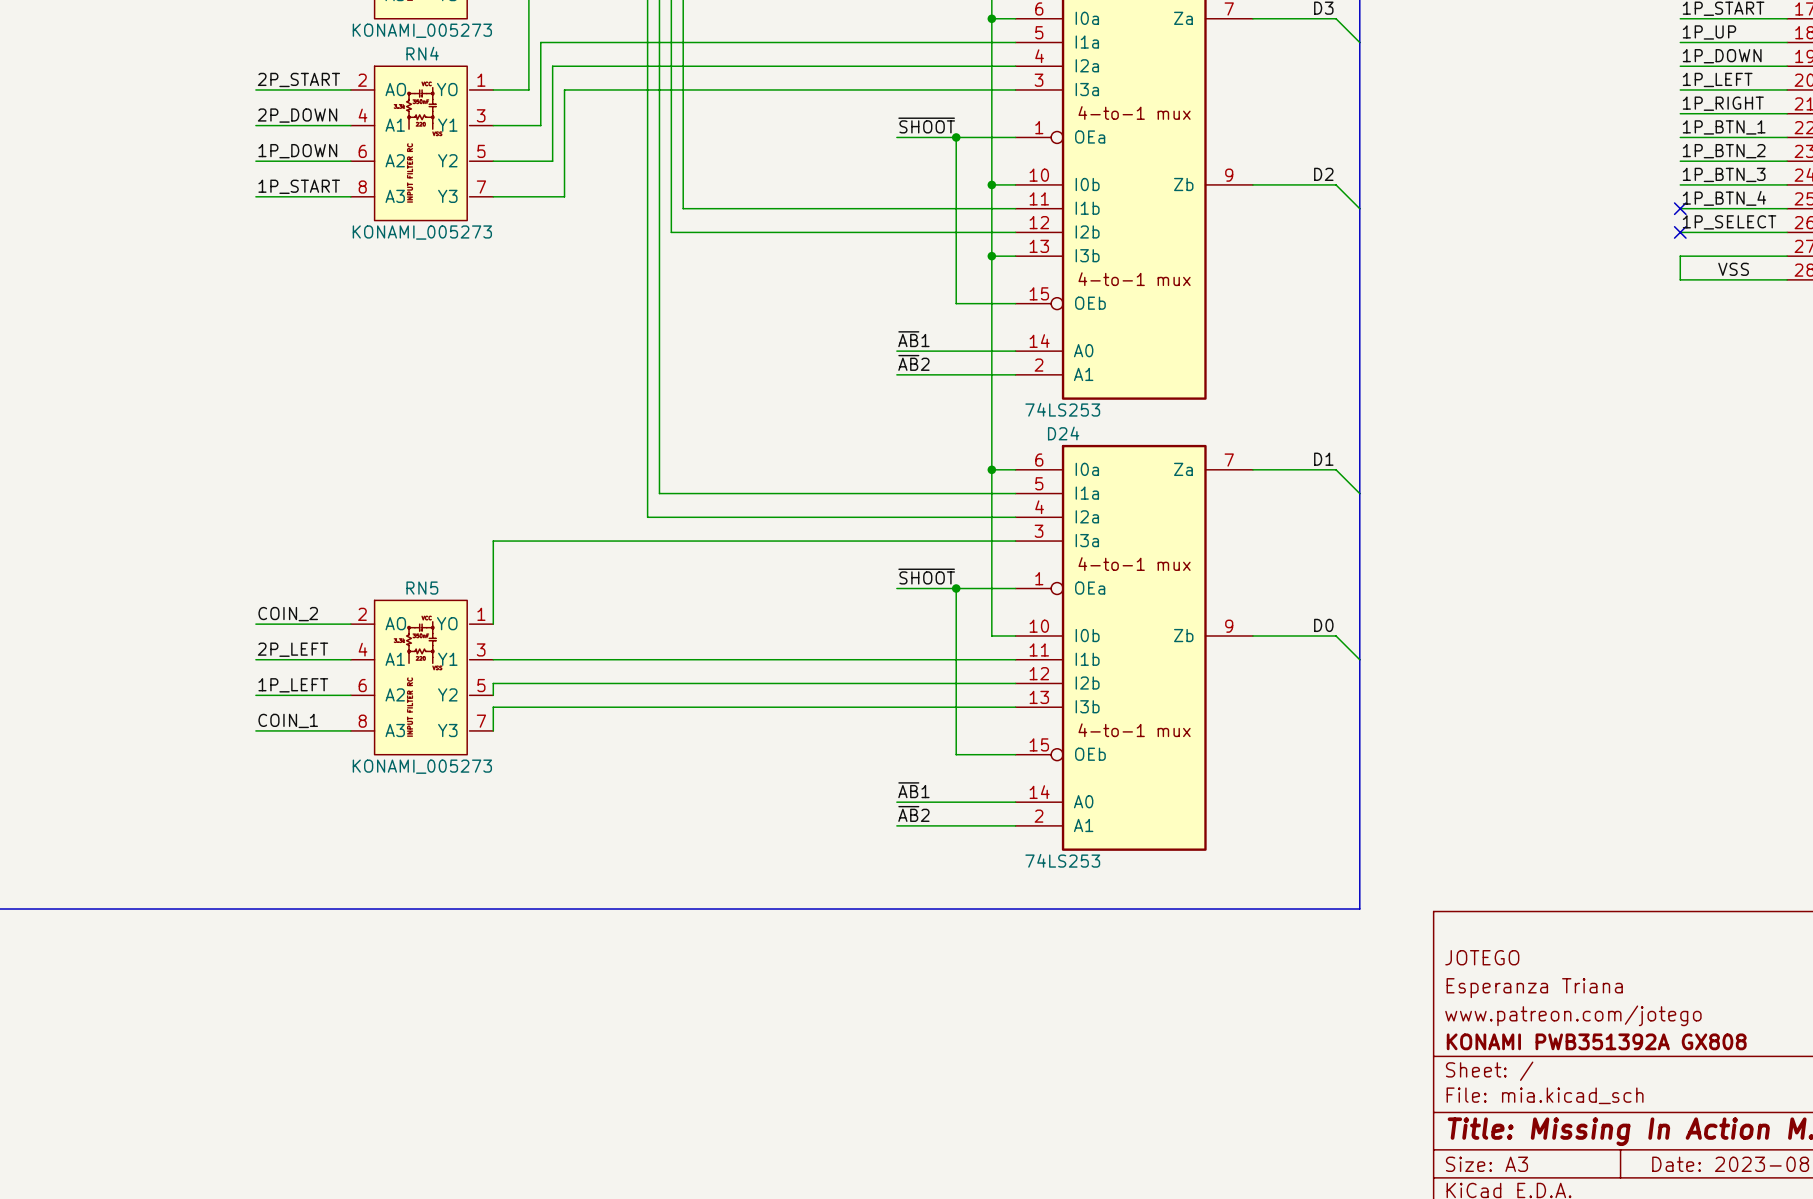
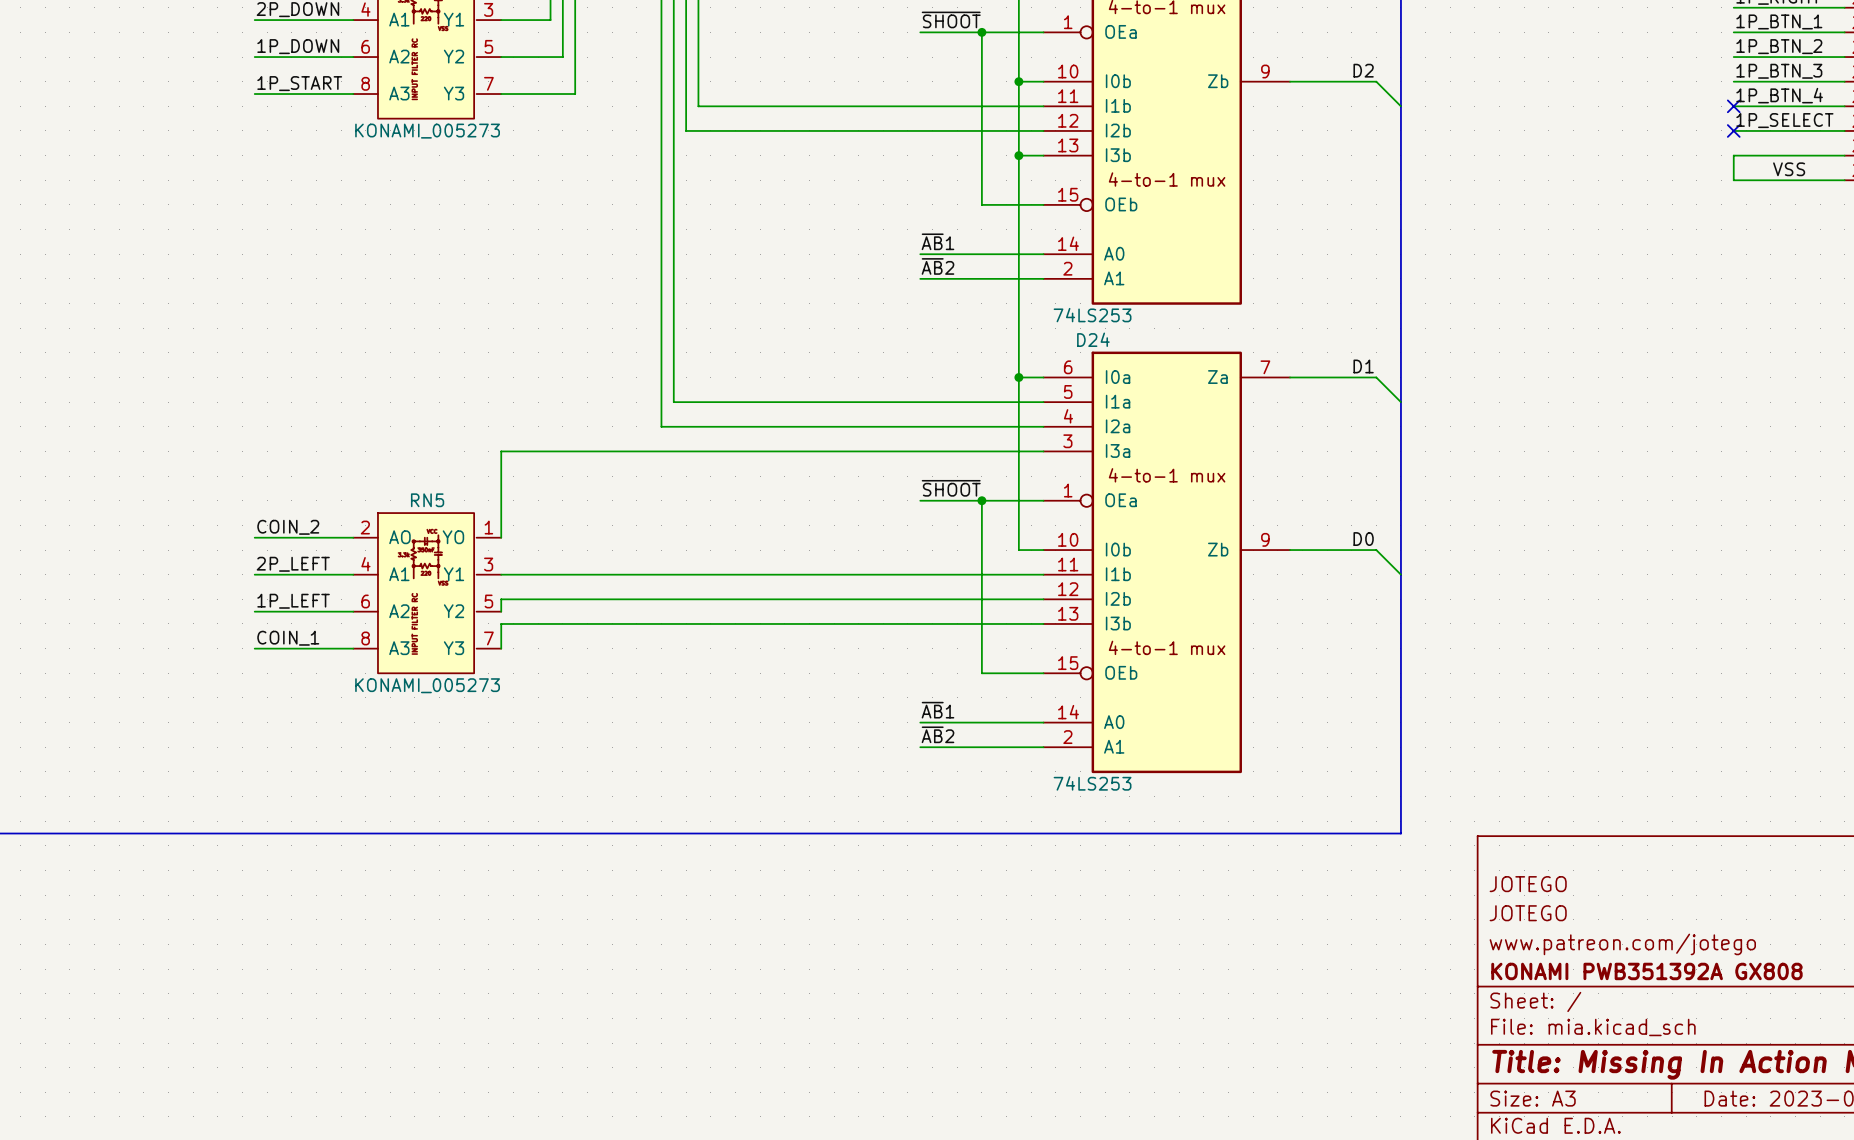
title block: Esperanza Triana (1534, 988) -> JOTEGO (1528, 913)

